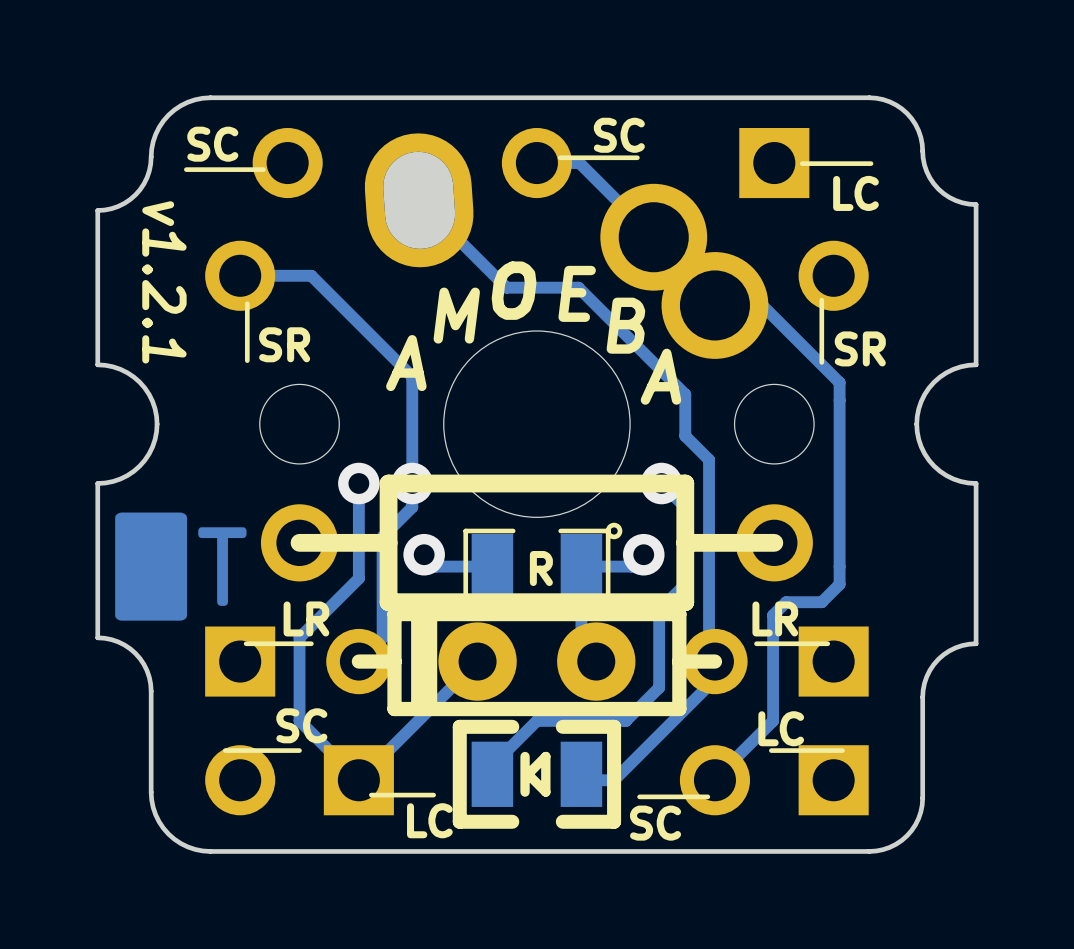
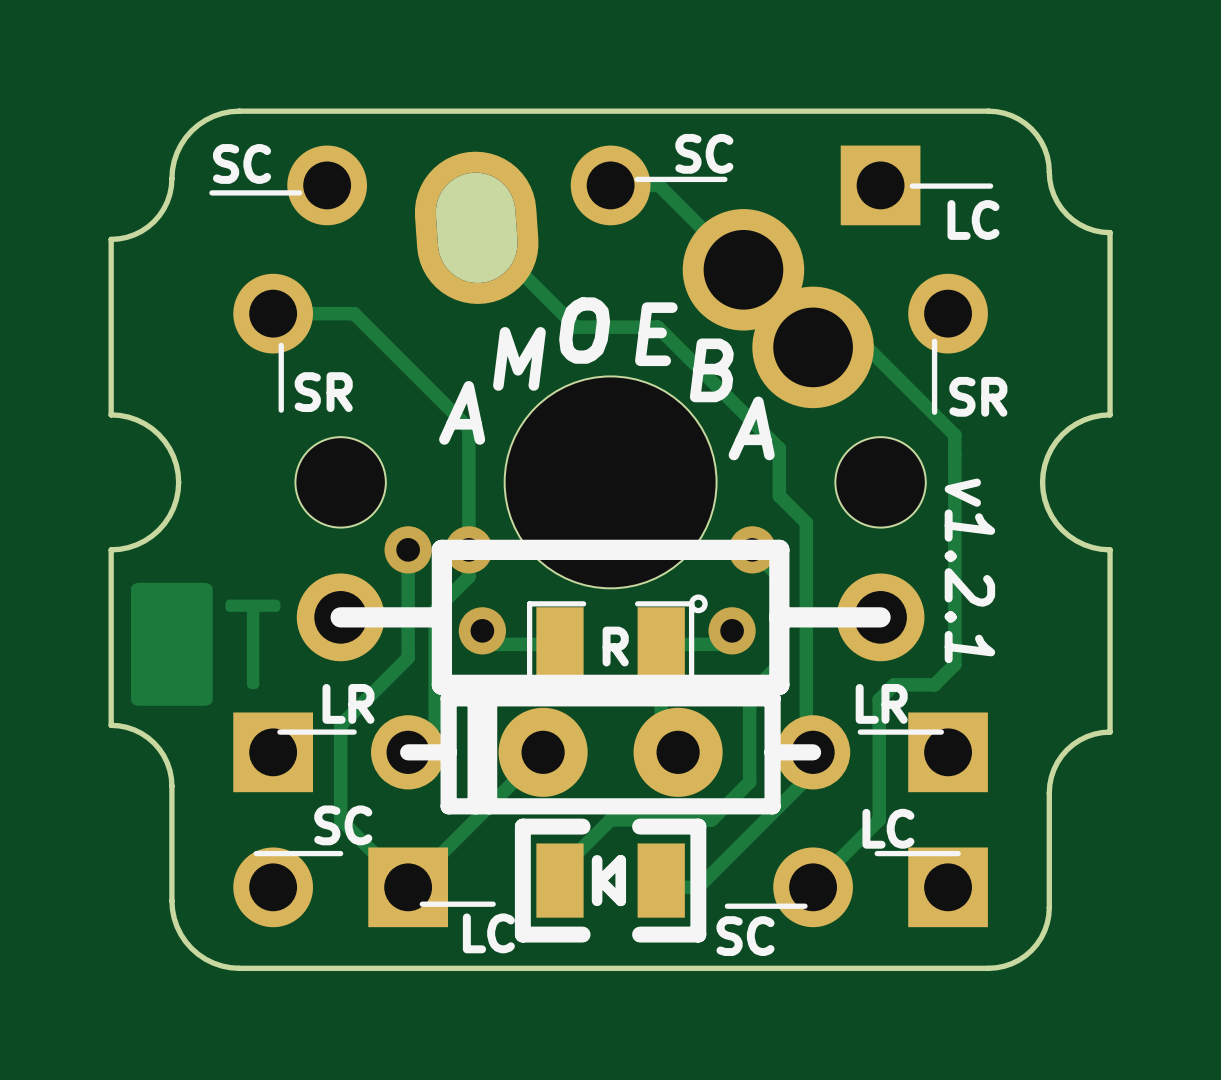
text position: v1.2.1 (164, 282) -> v1.2.1 (969, 570)

